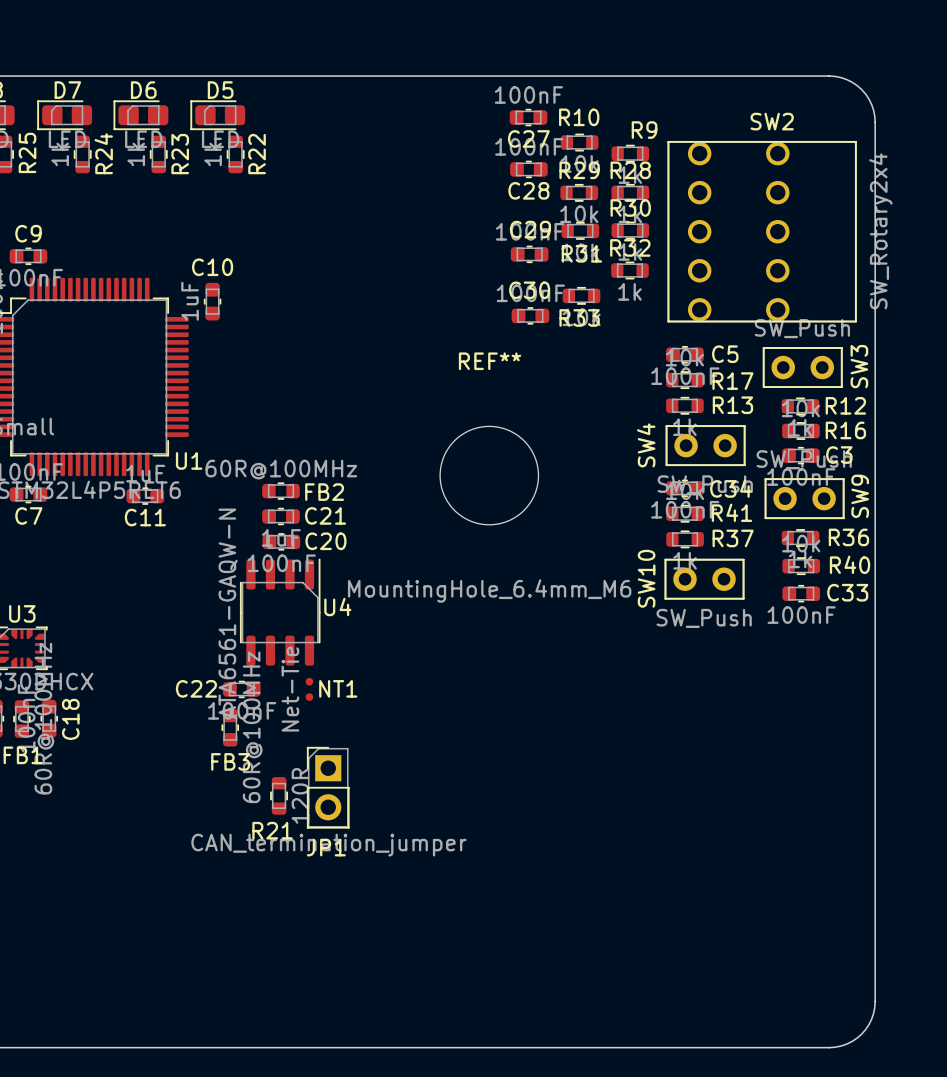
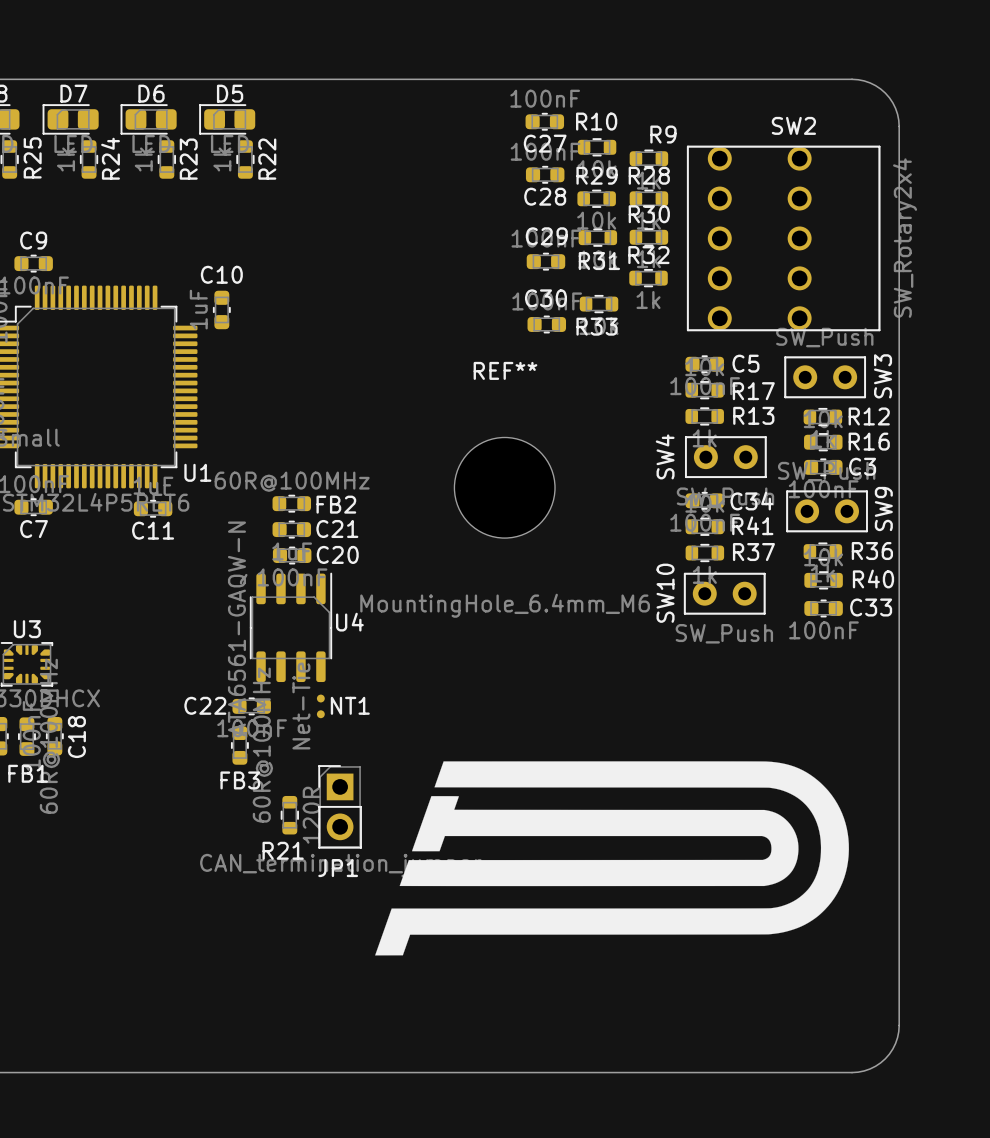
drawing: none -> [375, 761, 849, 956]

